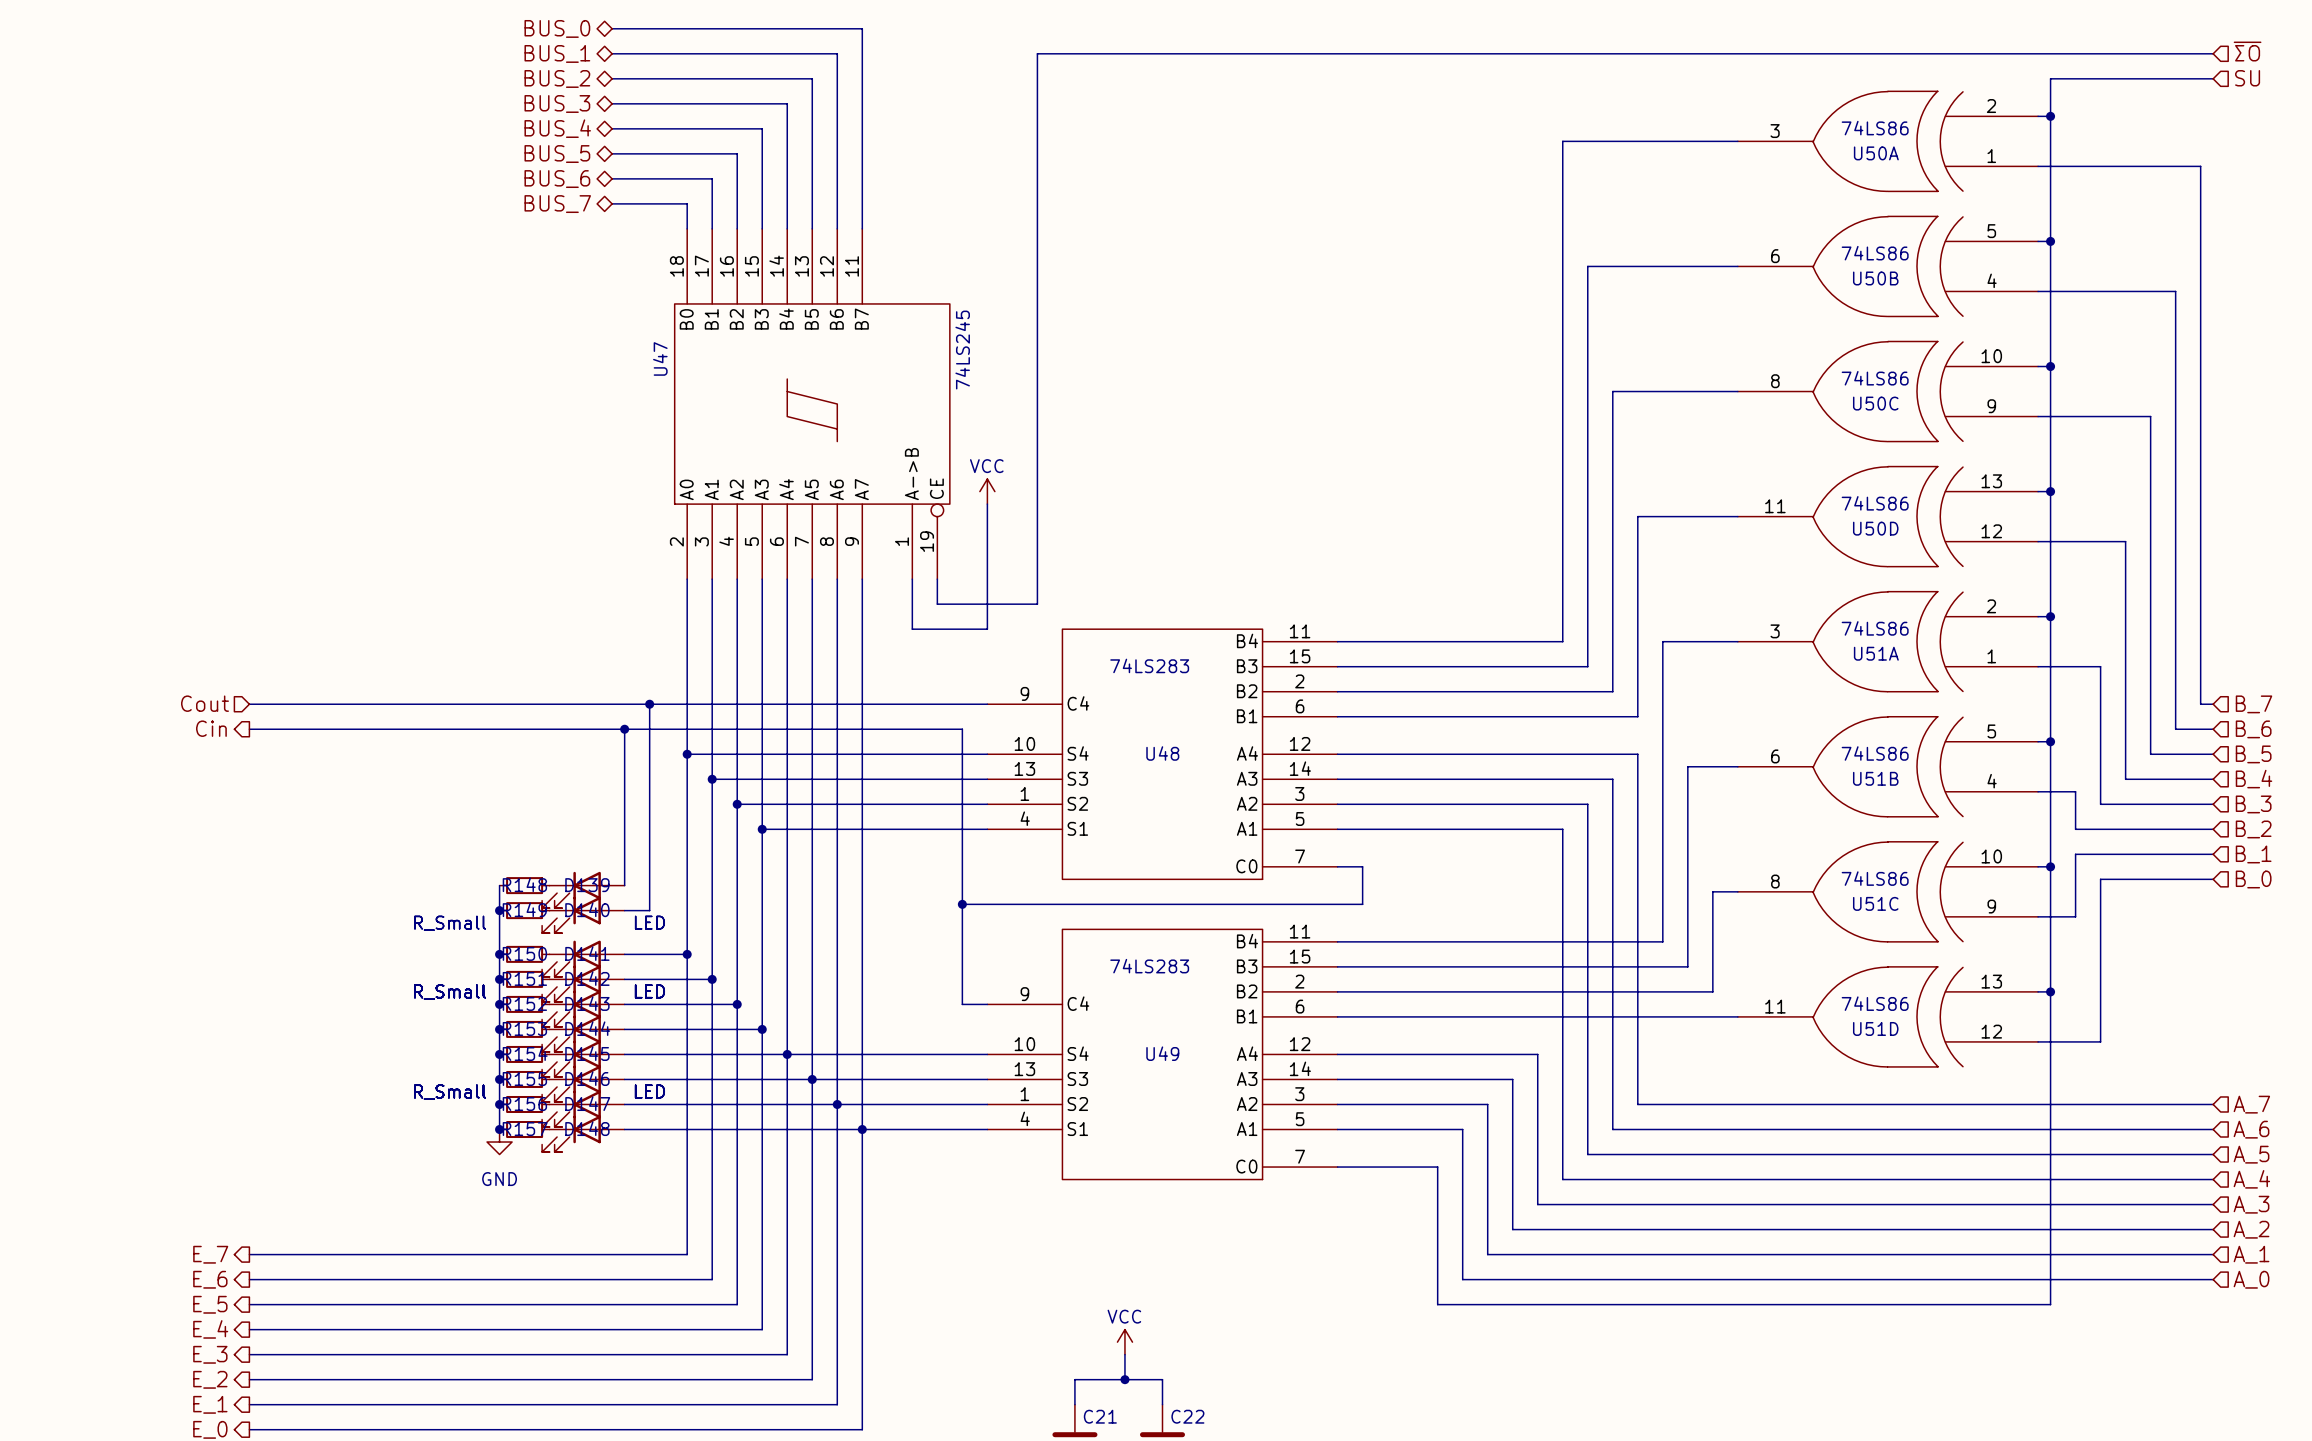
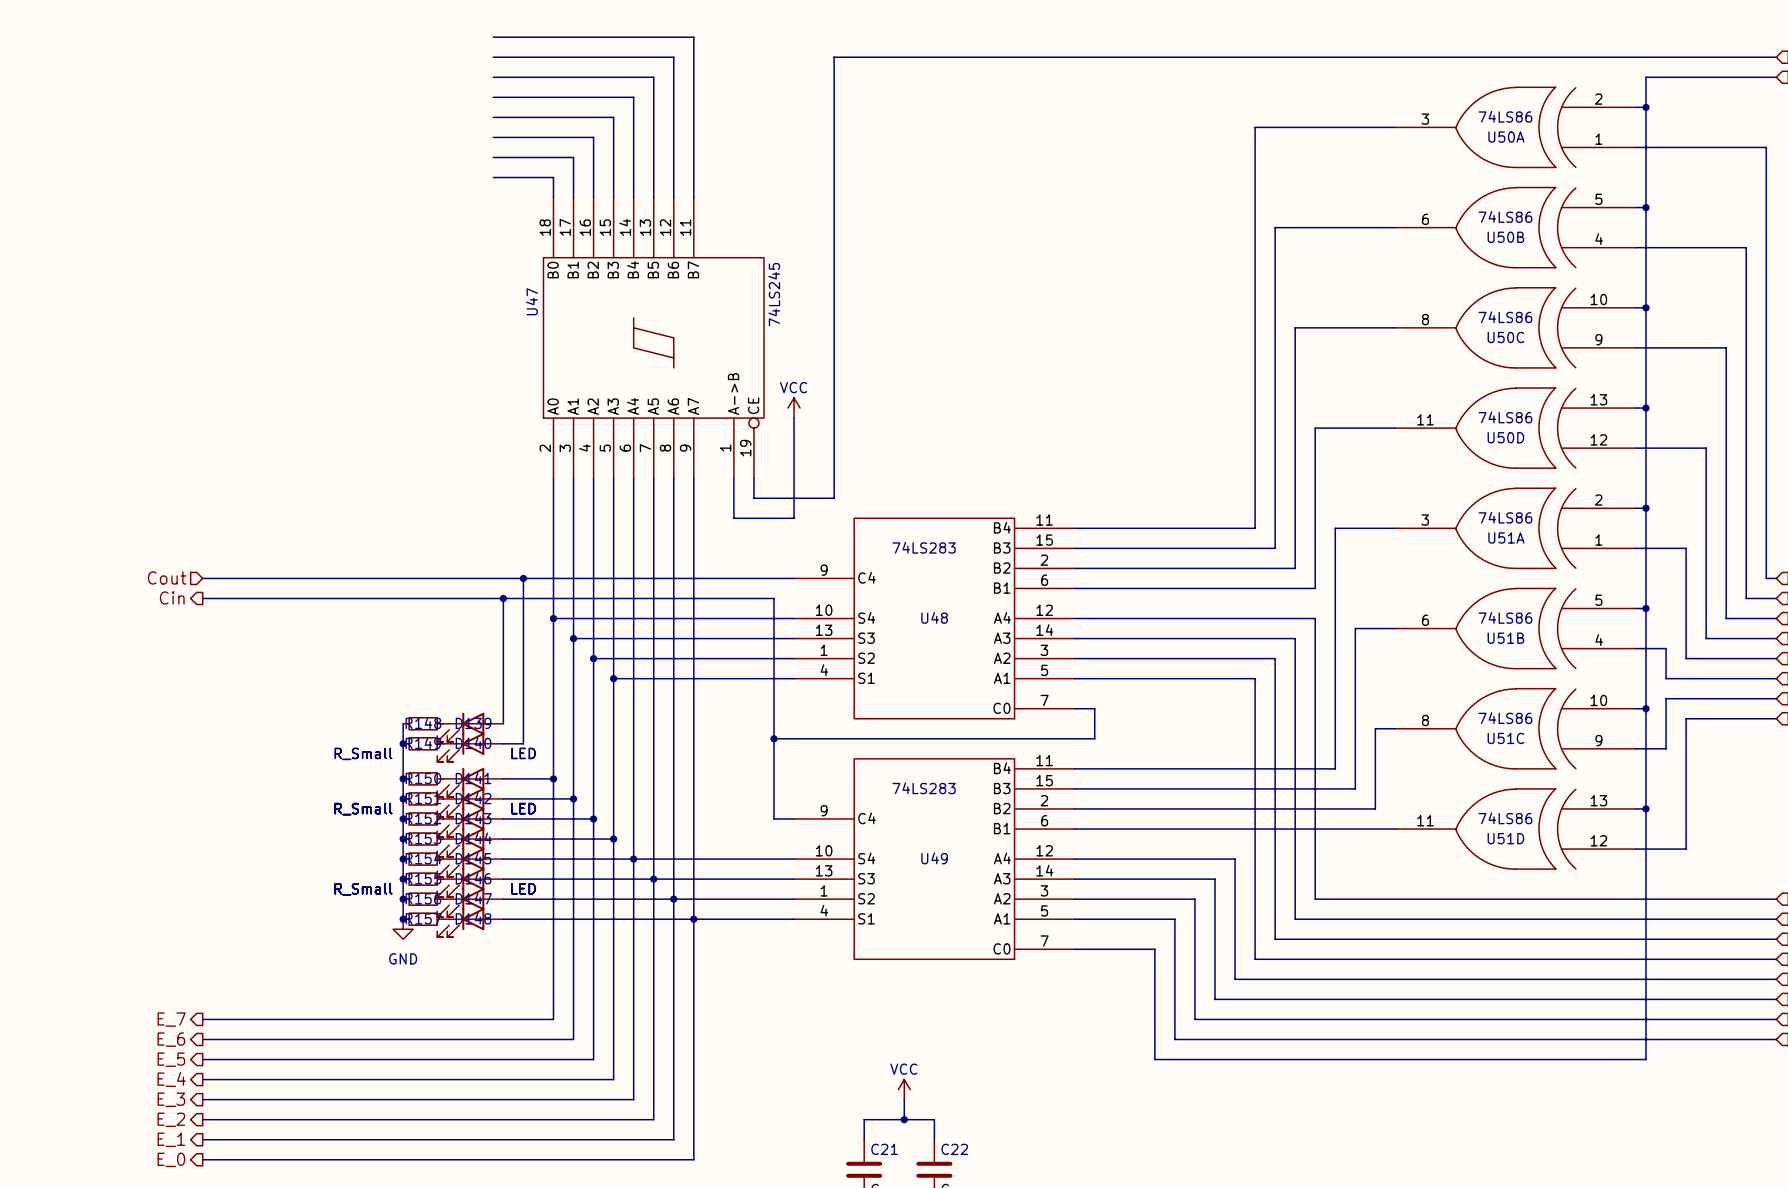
hierarchical label: BUS_0 (557, 28) -> none
hierarchical label: BUS_1 (557, 53) -> none
hierarchical label: BUS_2 (557, 78) -> none
hierarchical label: BUS_3 (557, 104) -> none
hierarchical label: BUS_4 (557, 128) -> none
hierarchical label: BUS_5 (557, 154) -> none
hierarchical label: BUS_6 (557, 179) -> none
hierarchical label: BUS_7 (557, 204) -> none

